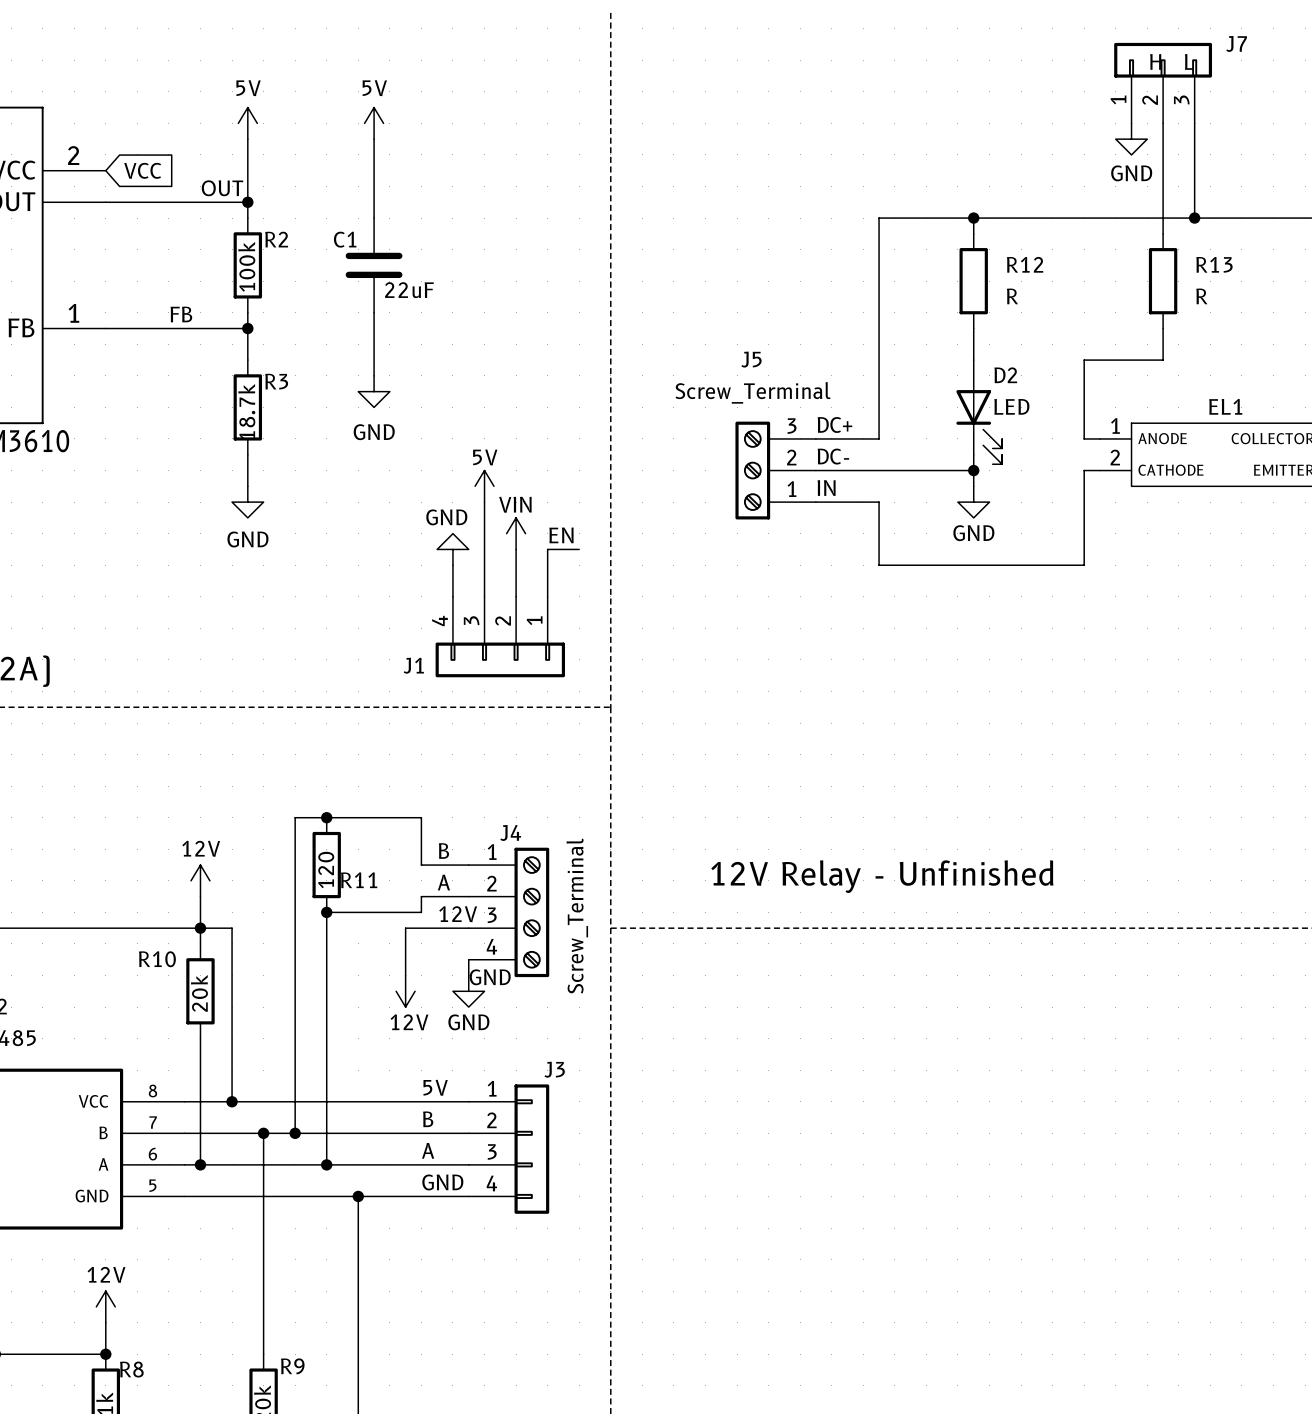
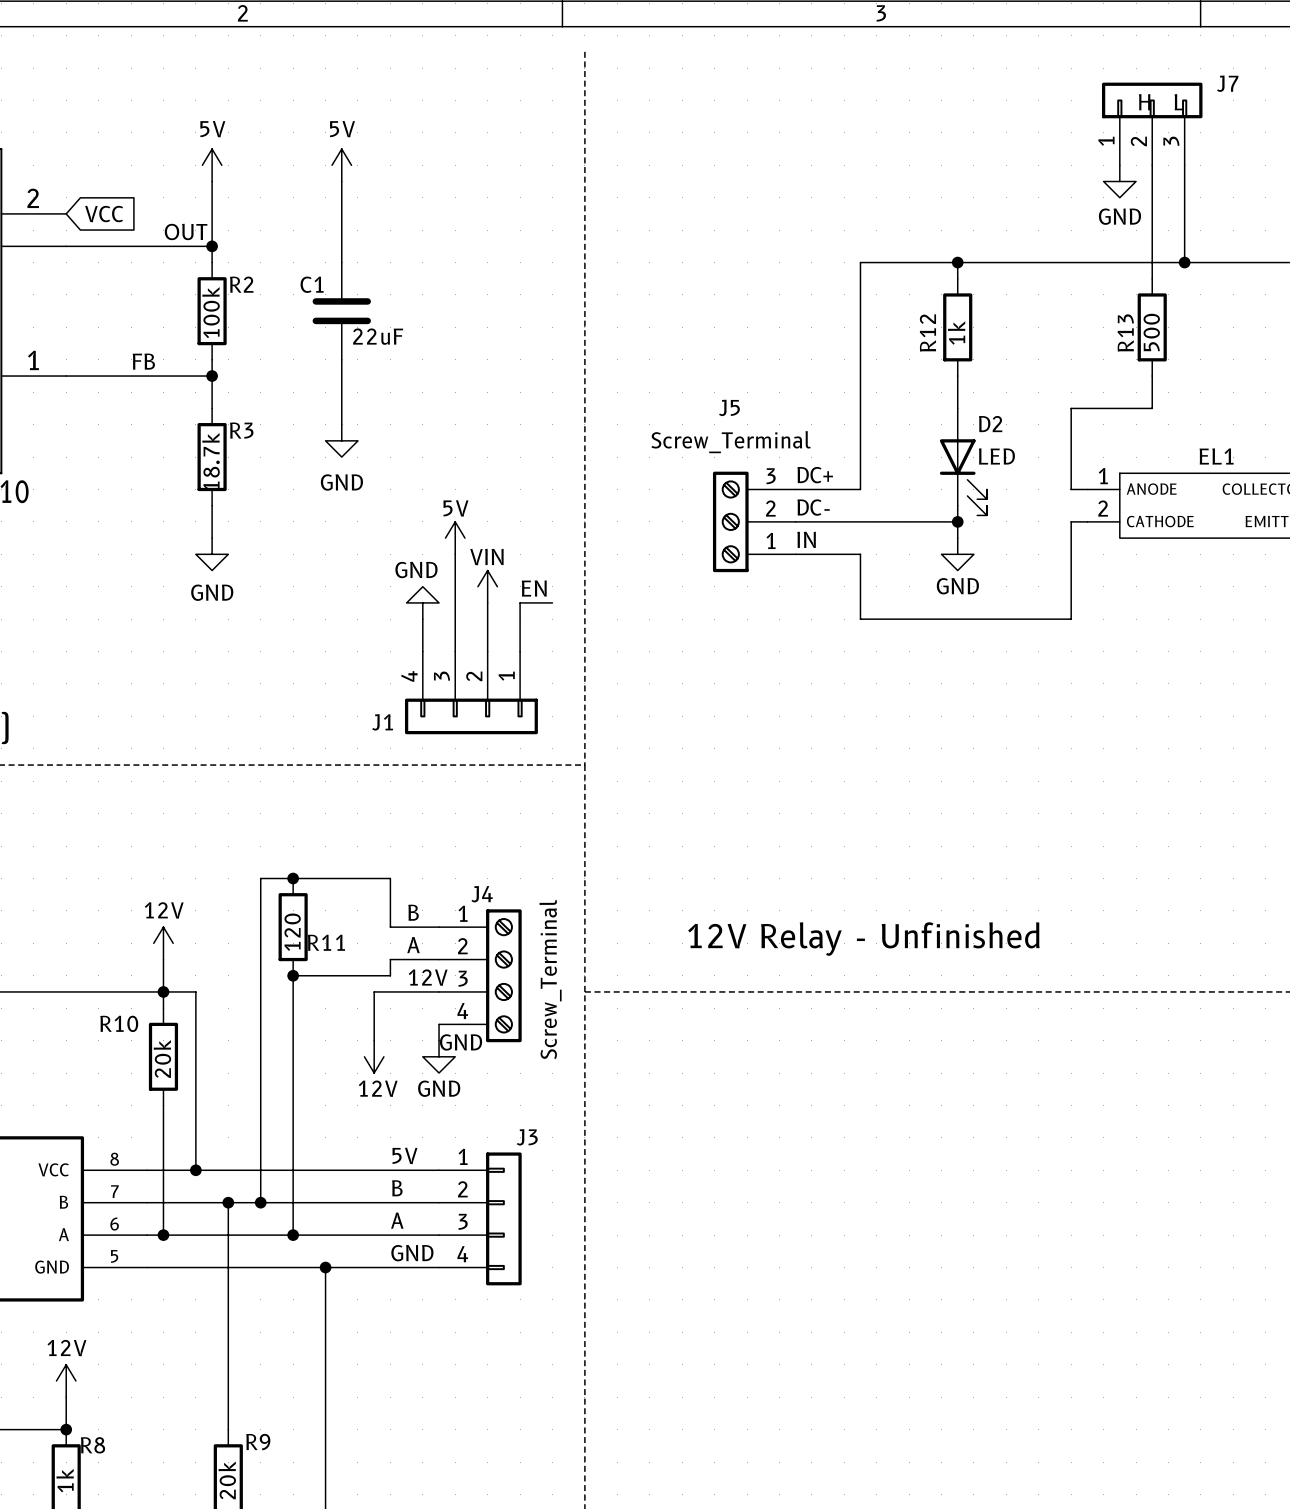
R12 name rotation: 0° (1025, 264) -> 90° counterclockwise (927, 333)
R12 name position: R12 (1025, 264) -> R12 (927, 333)
R13 name rotation: 0° (1214, 264) -> 90° counterclockwise (1125, 332)
R13 name position: R13 (1214, 264) -> R13 (1125, 332)
R12 value: R (1012, 296) -> 1k (956, 333)
R13 value: R (1201, 296) -> 500 (1151, 332)

